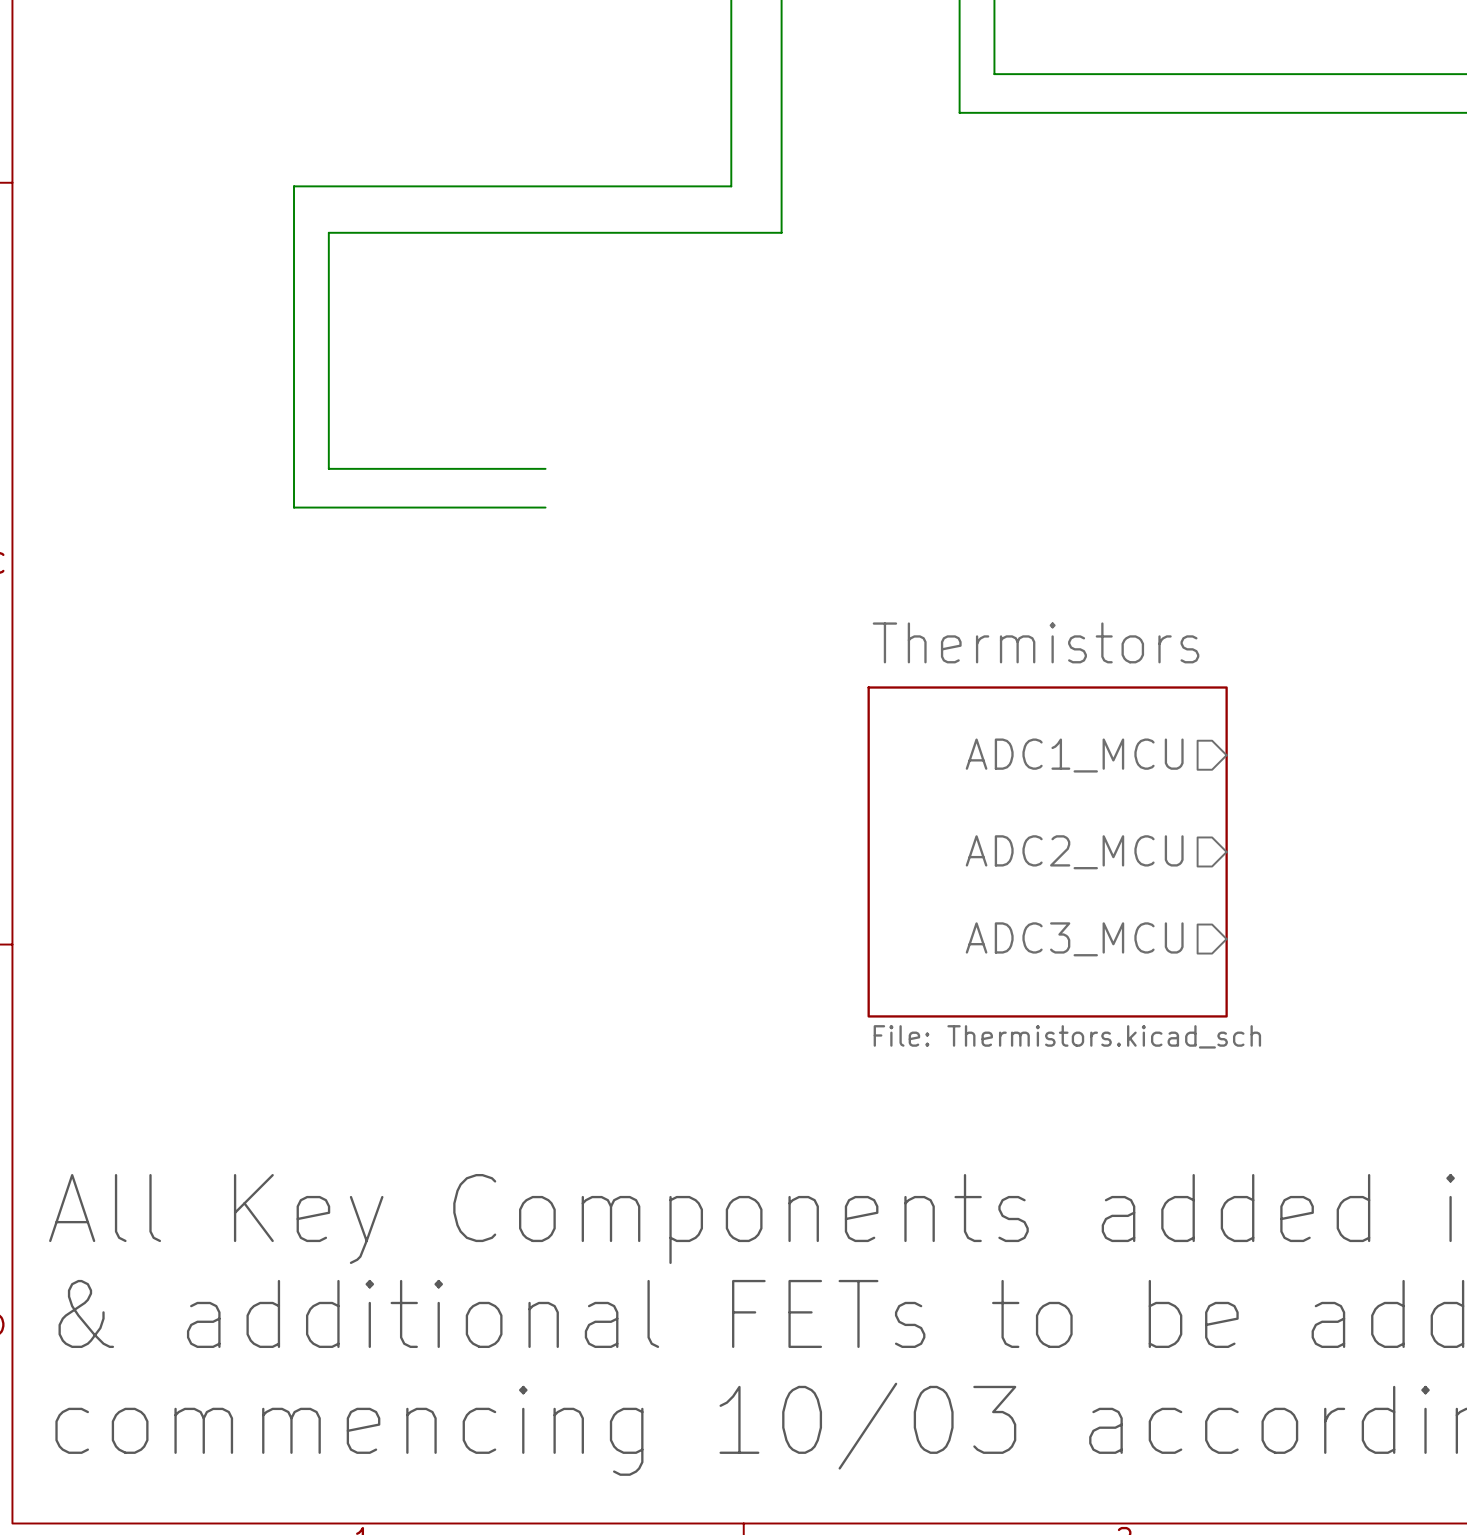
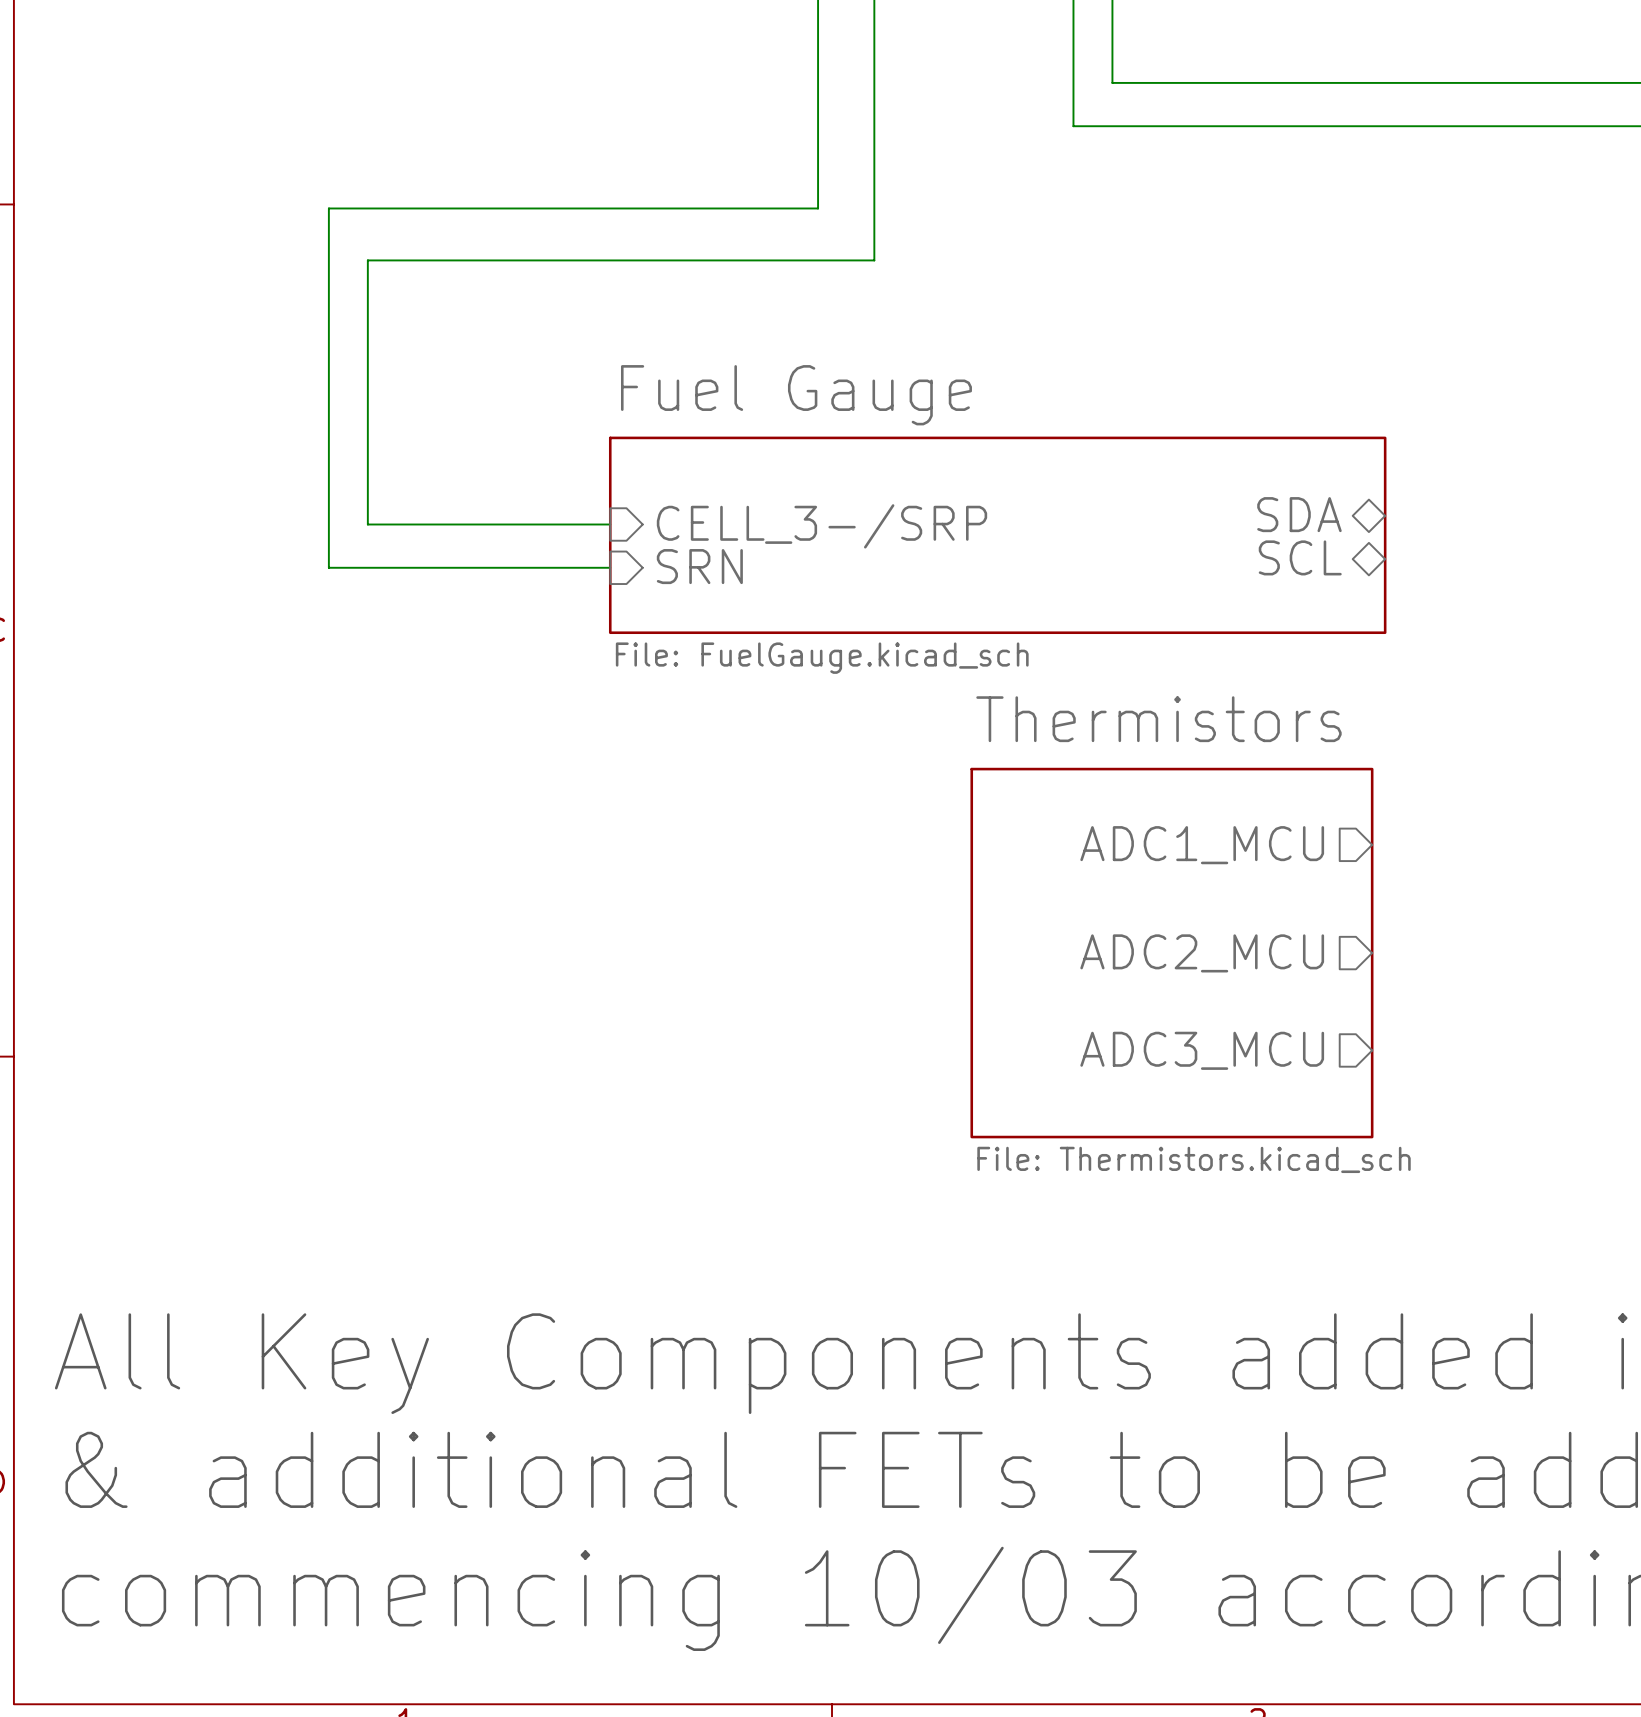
sheet pin: none -> SDA (1299, 514)
sheet pin: none -> CELL_3-/SRP (821, 526)
sheet Fuel Gauge: none -> File: FuelGauge.kicad_sch (997, 535)
sheet pin: none -> SCL (1300, 557)
sheet pin: none -> SRN (699, 566)

